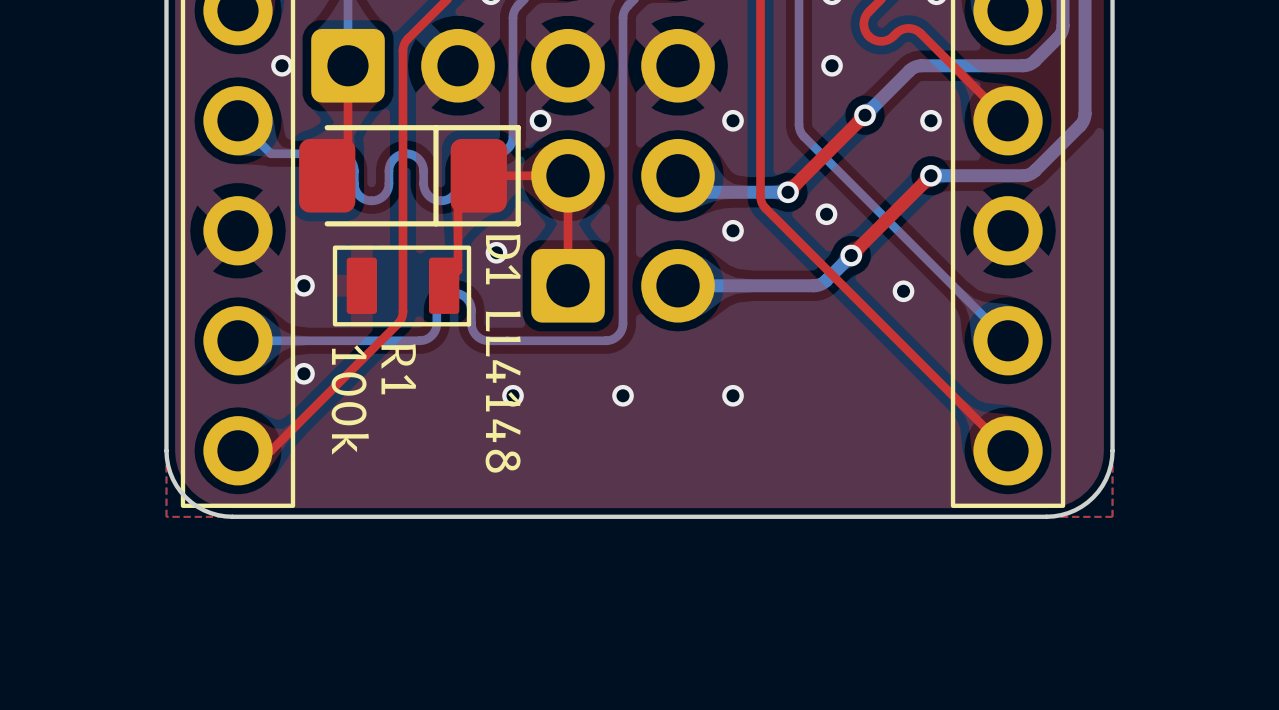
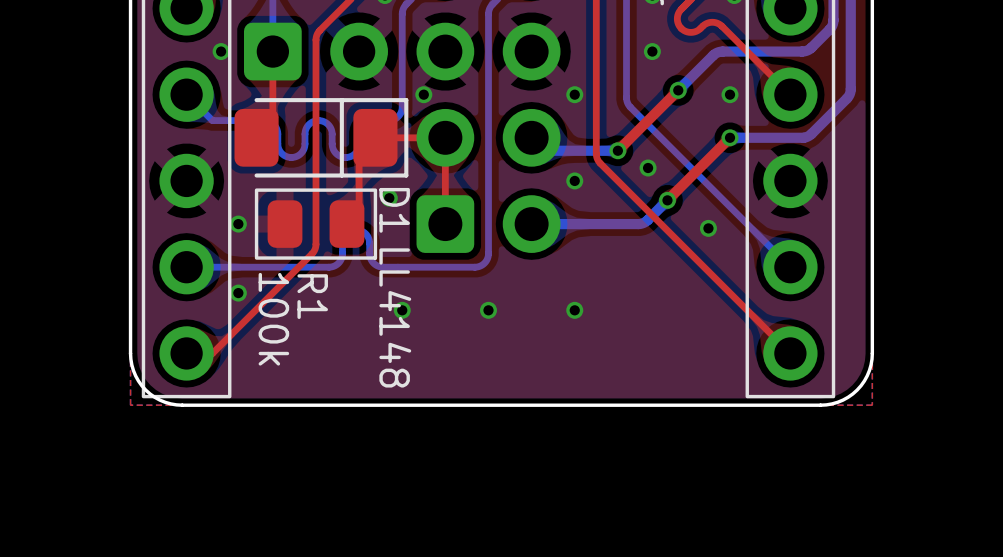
R1 footprint: [332, 245, 472, 327] -> [254, 188, 378, 260]

